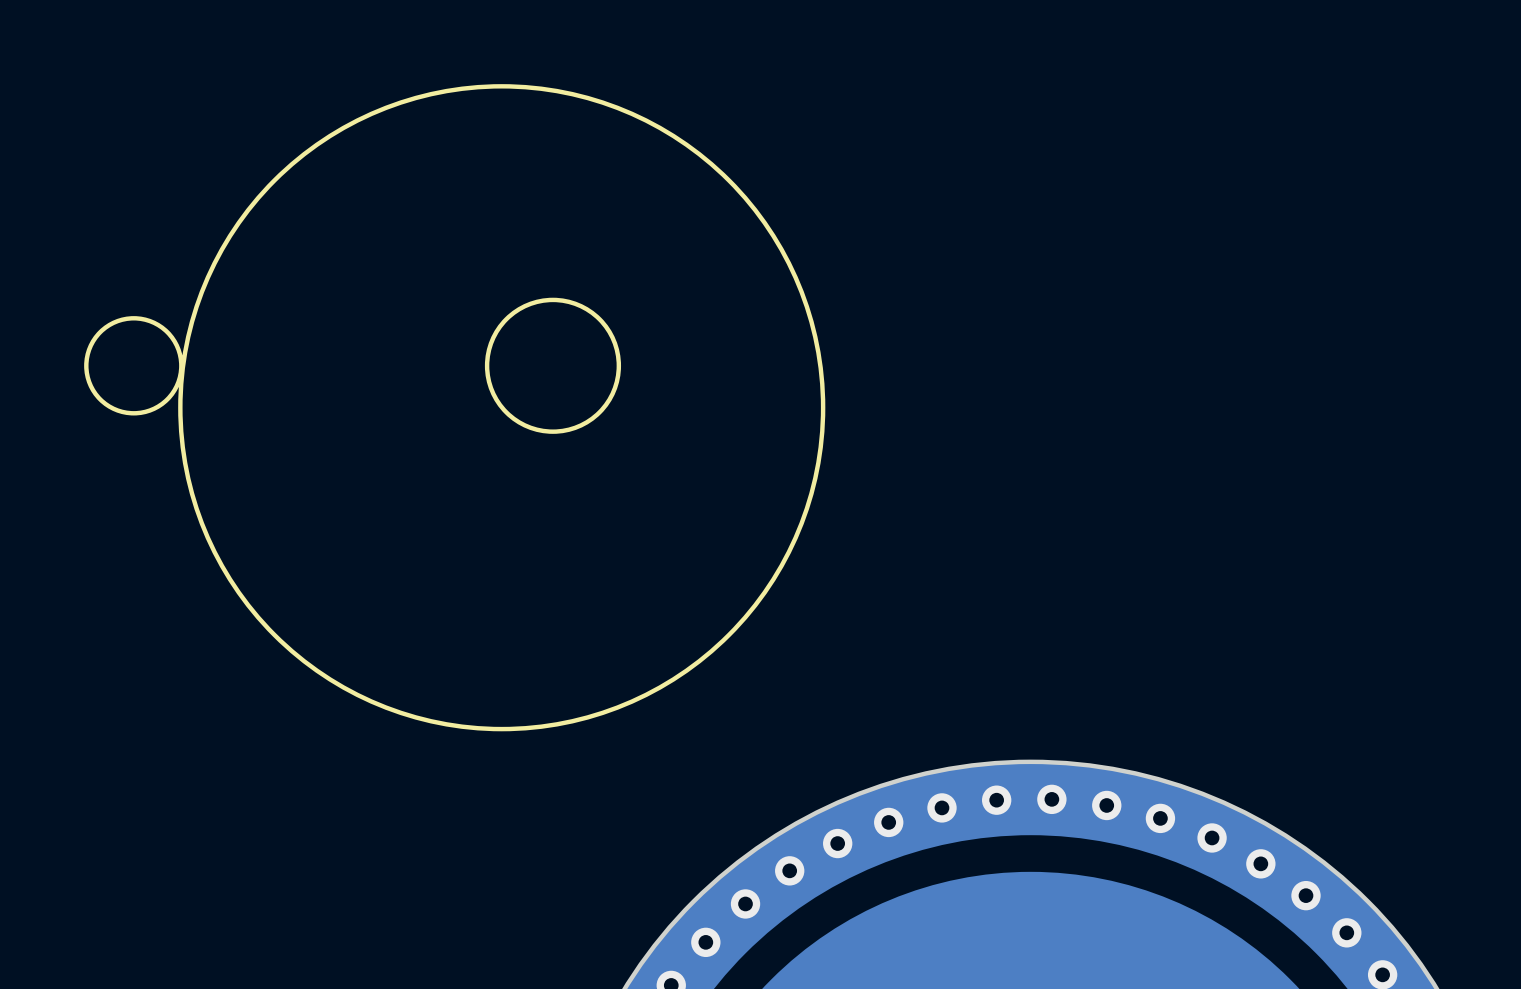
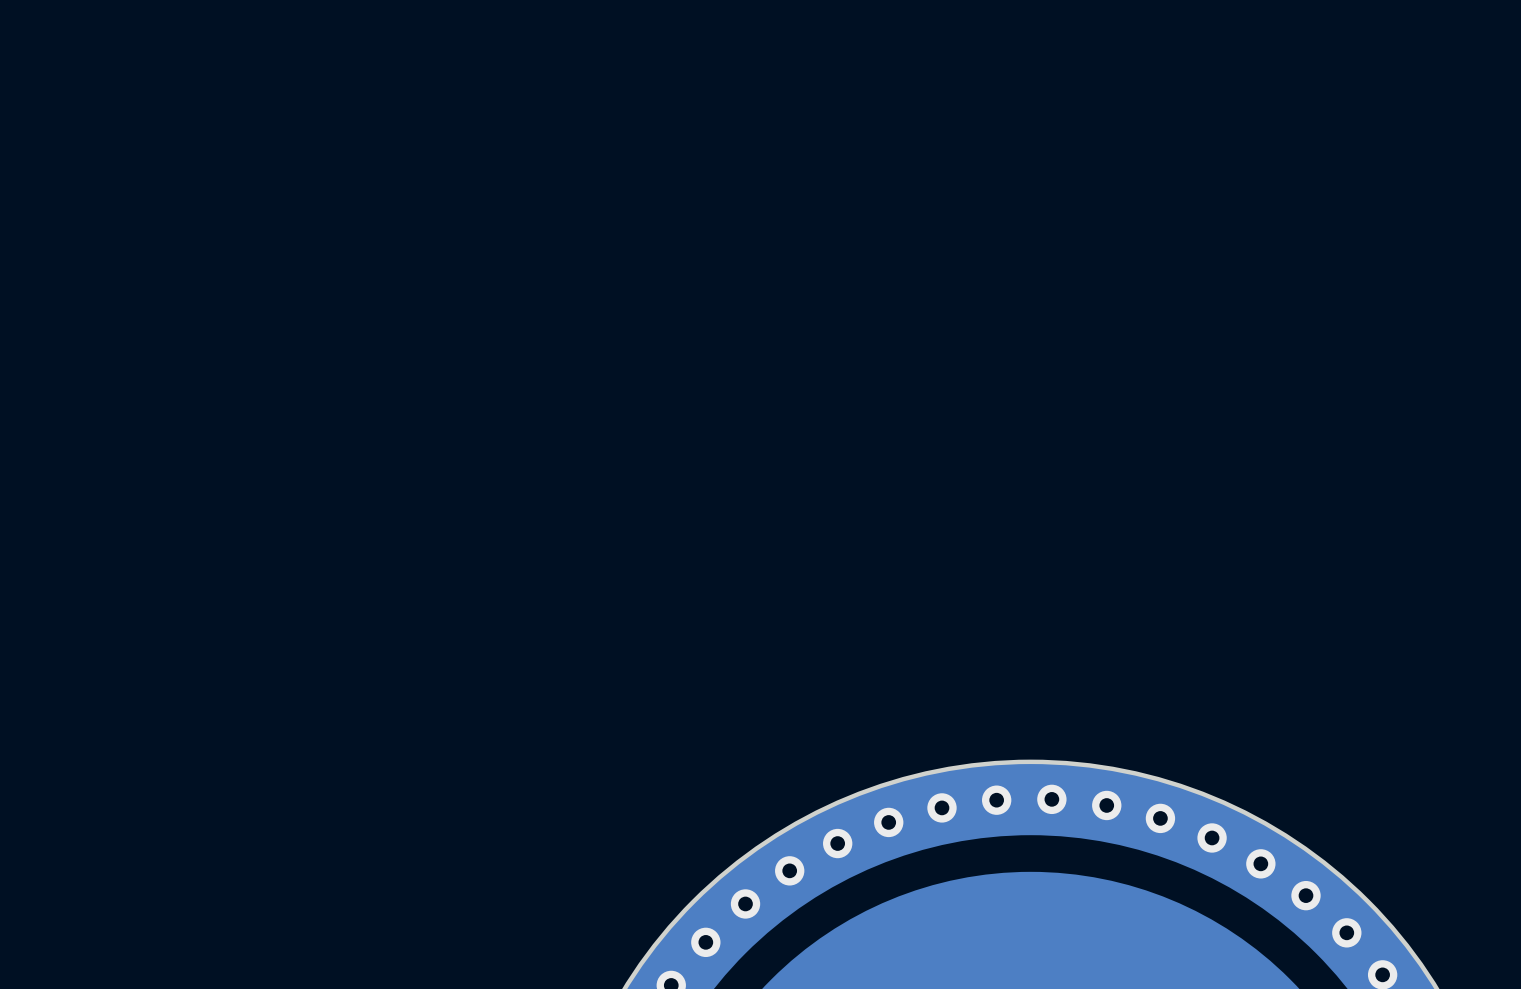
drawing: [84, 84, 826, 732] -> none

